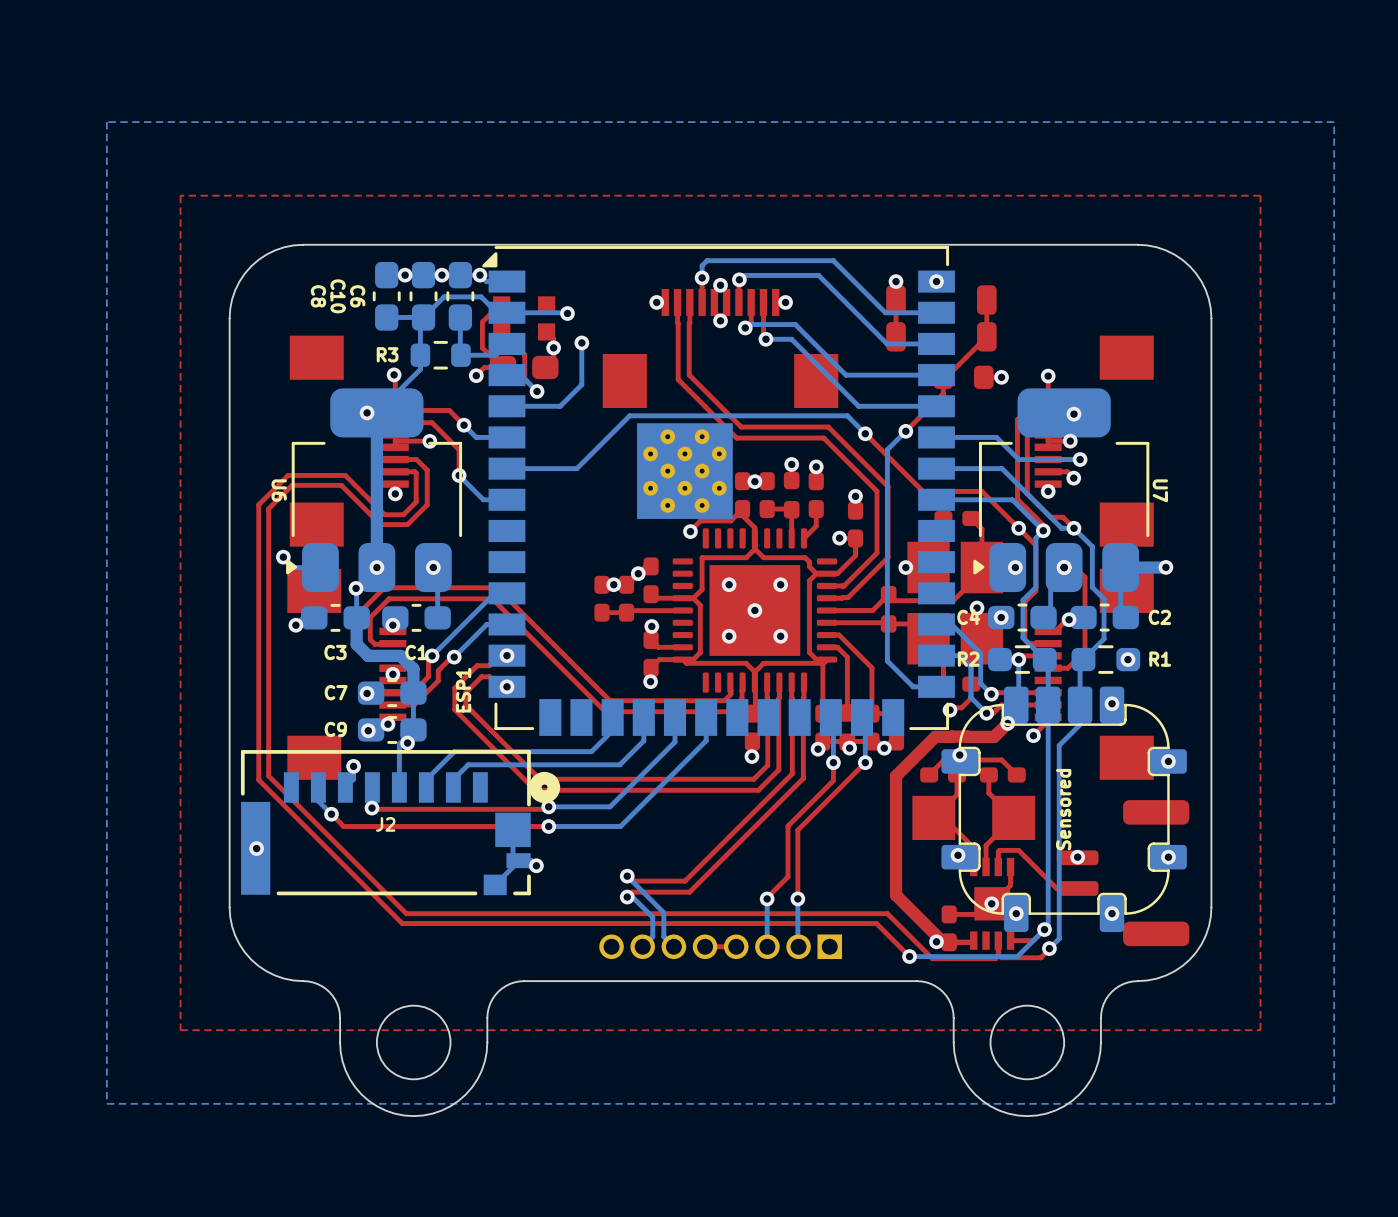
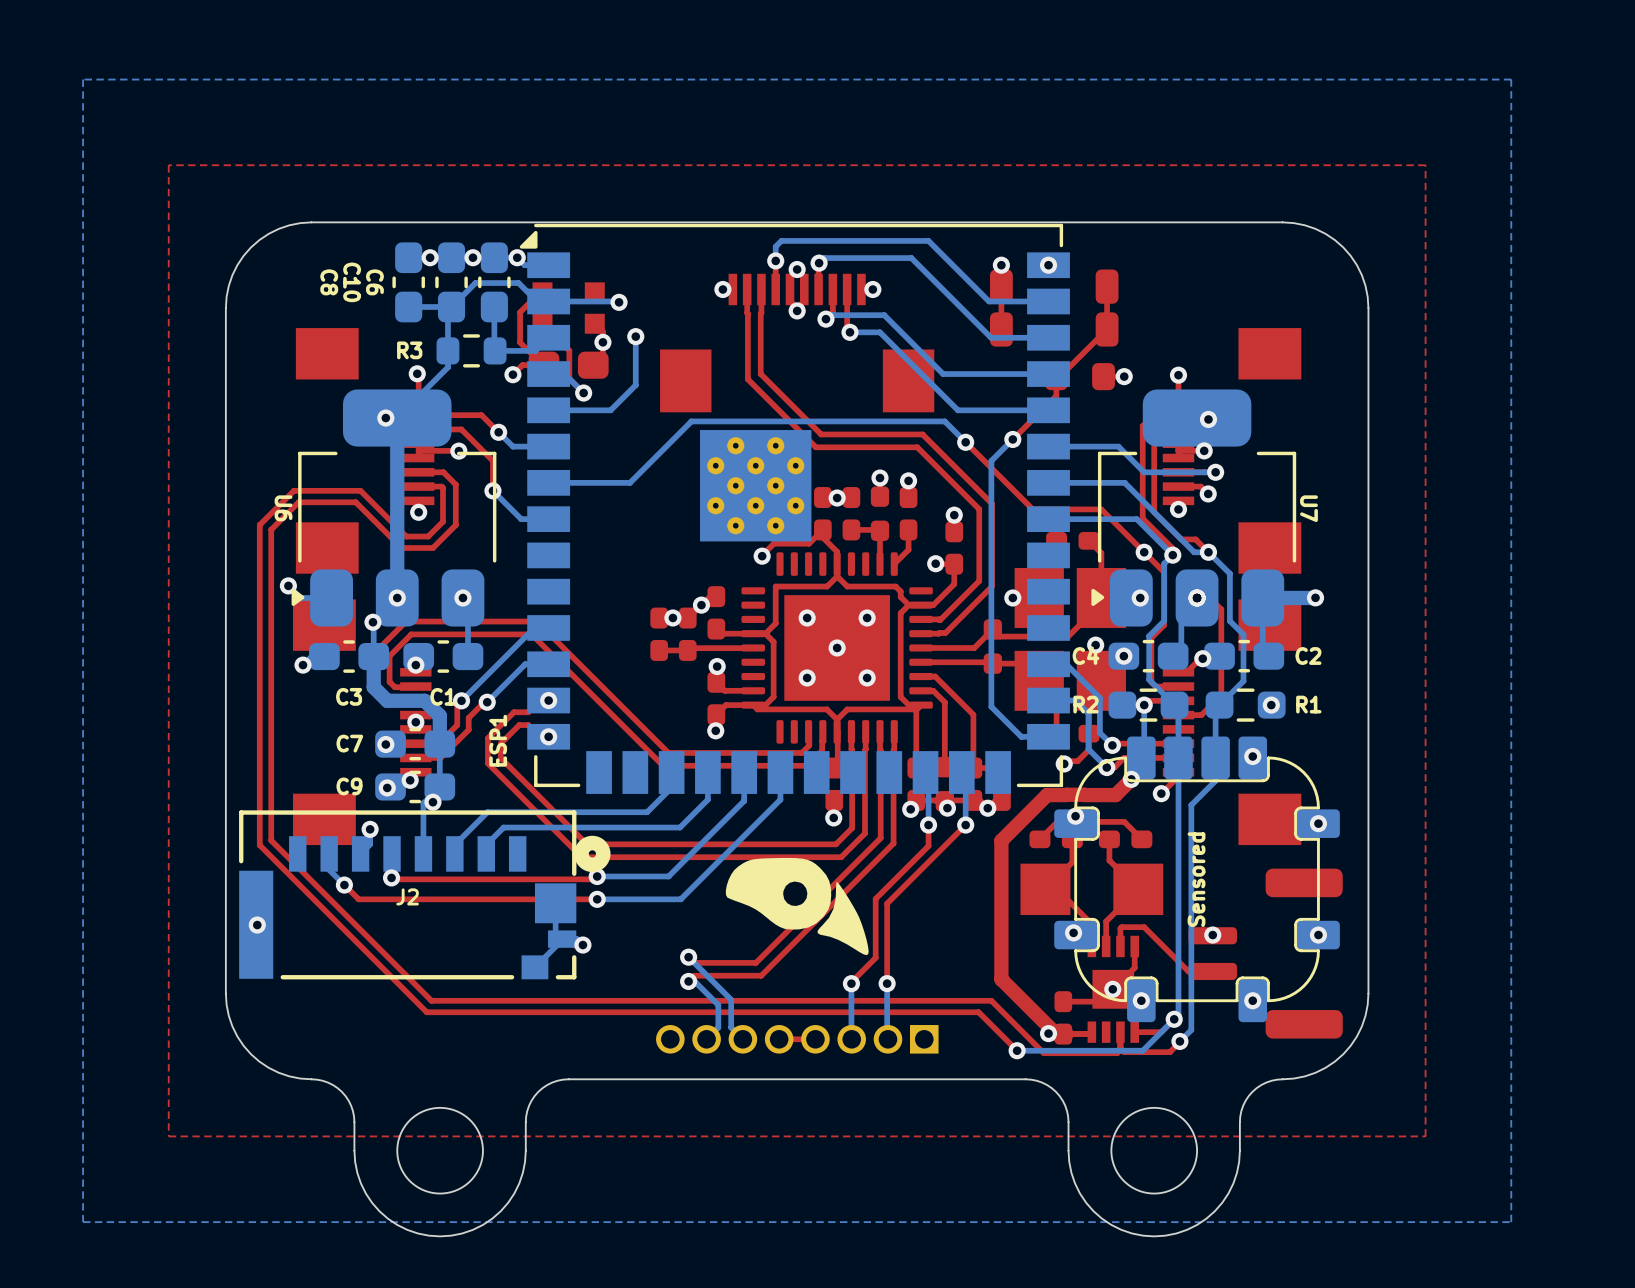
drawing: none -> [725, 857, 869, 956]

